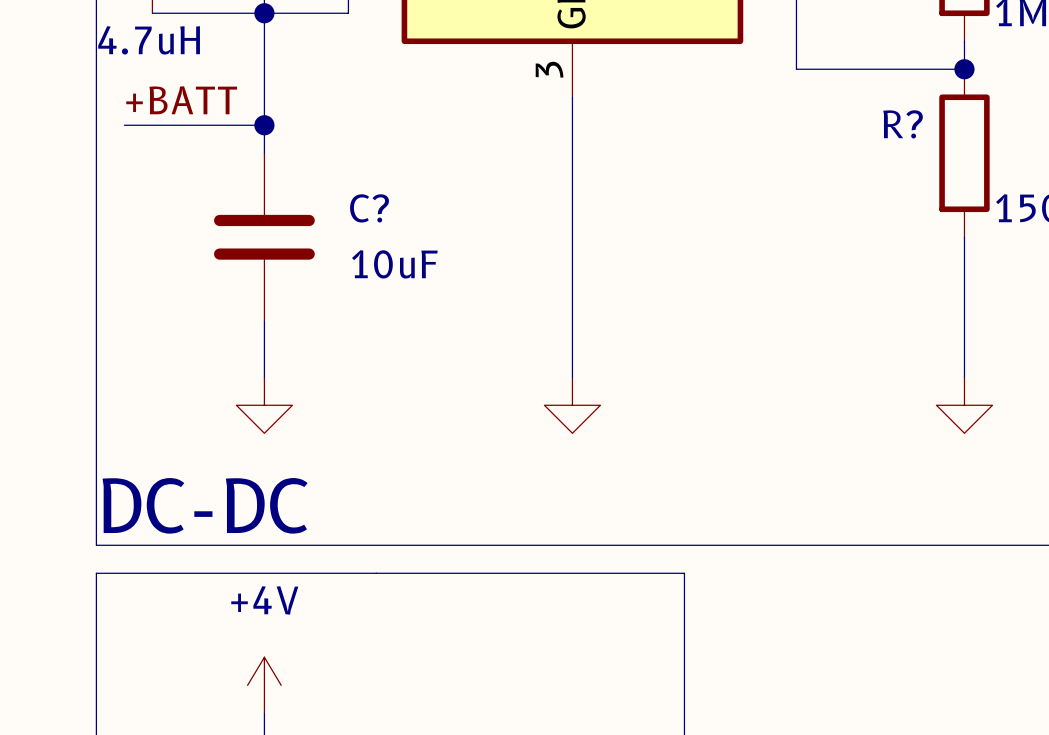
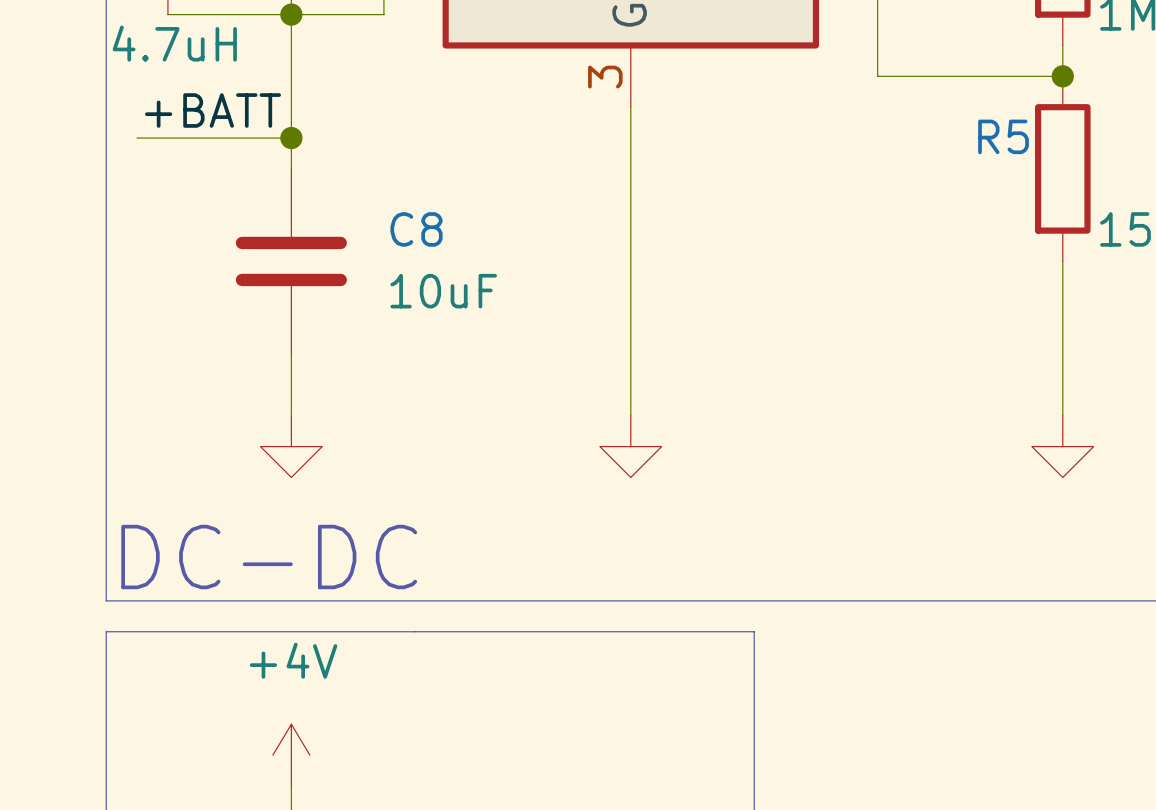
R? name: R? (903, 124) -> R5 (1003, 136)
C? name: C? (369, 208) -> C8 (416, 229)

